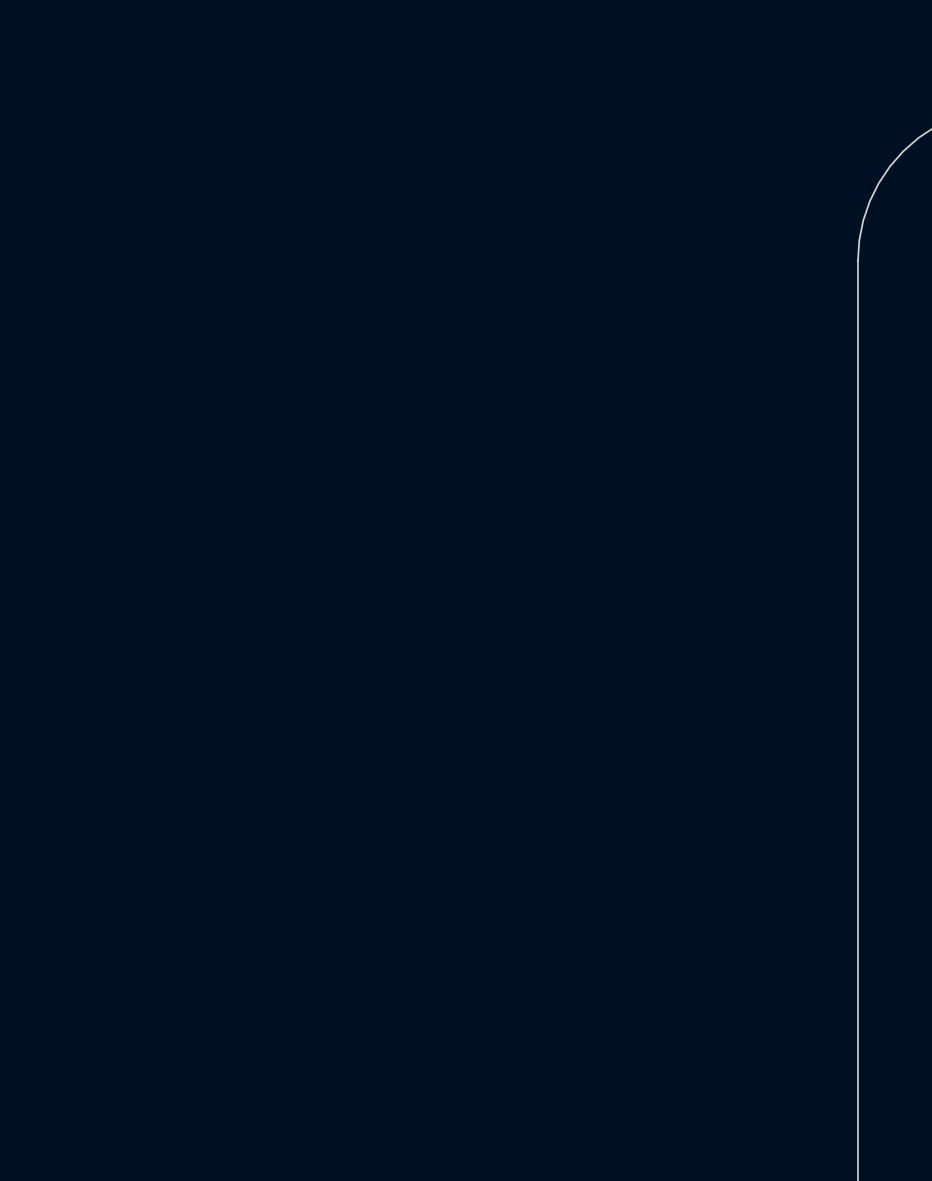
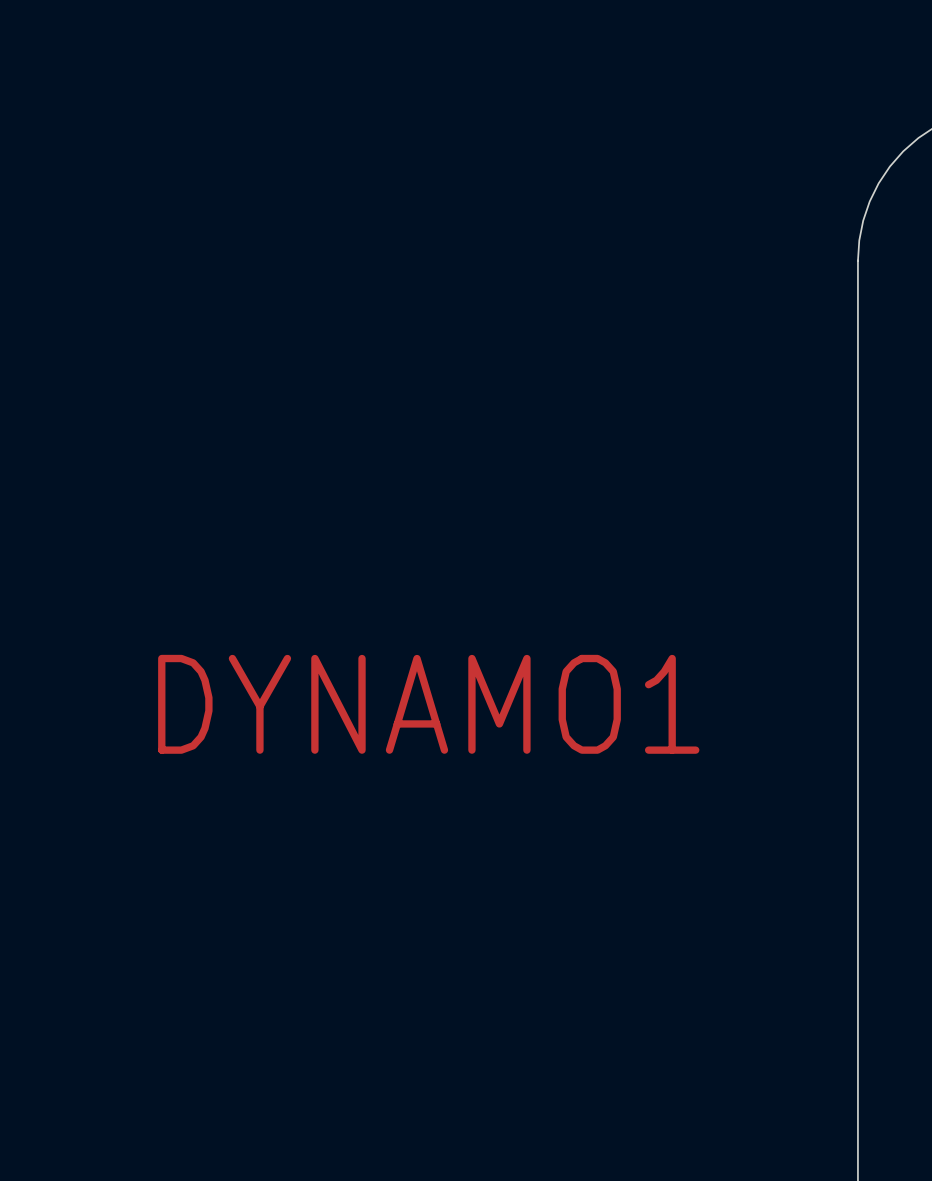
text: none -> DYNAMO1 (428, 704)

